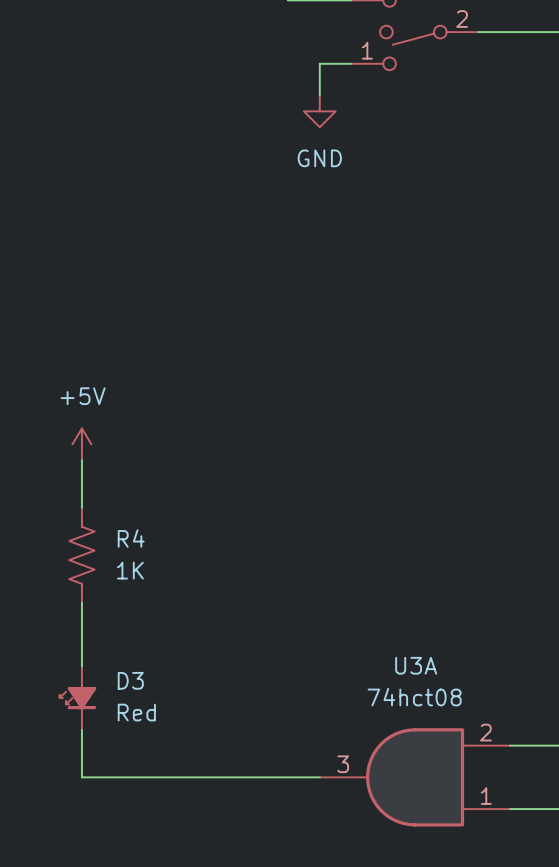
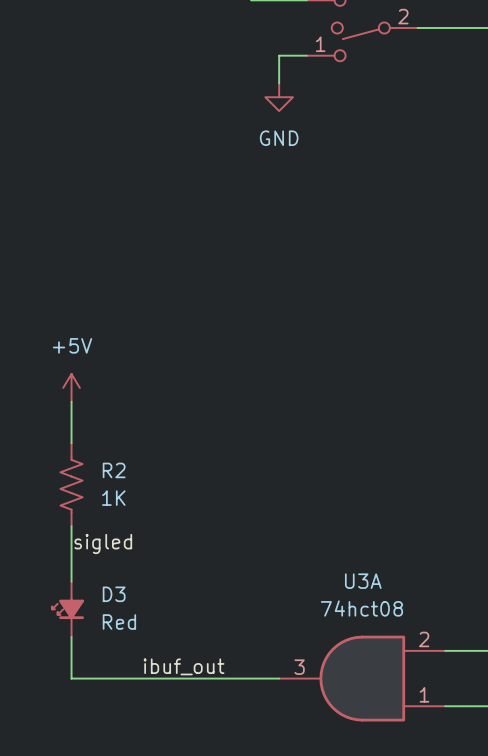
R4 name: R4 (131, 538) -> R2 (114, 470)
label: none -> sigled (103, 543)
label: none -> ibuf_out (184, 666)

